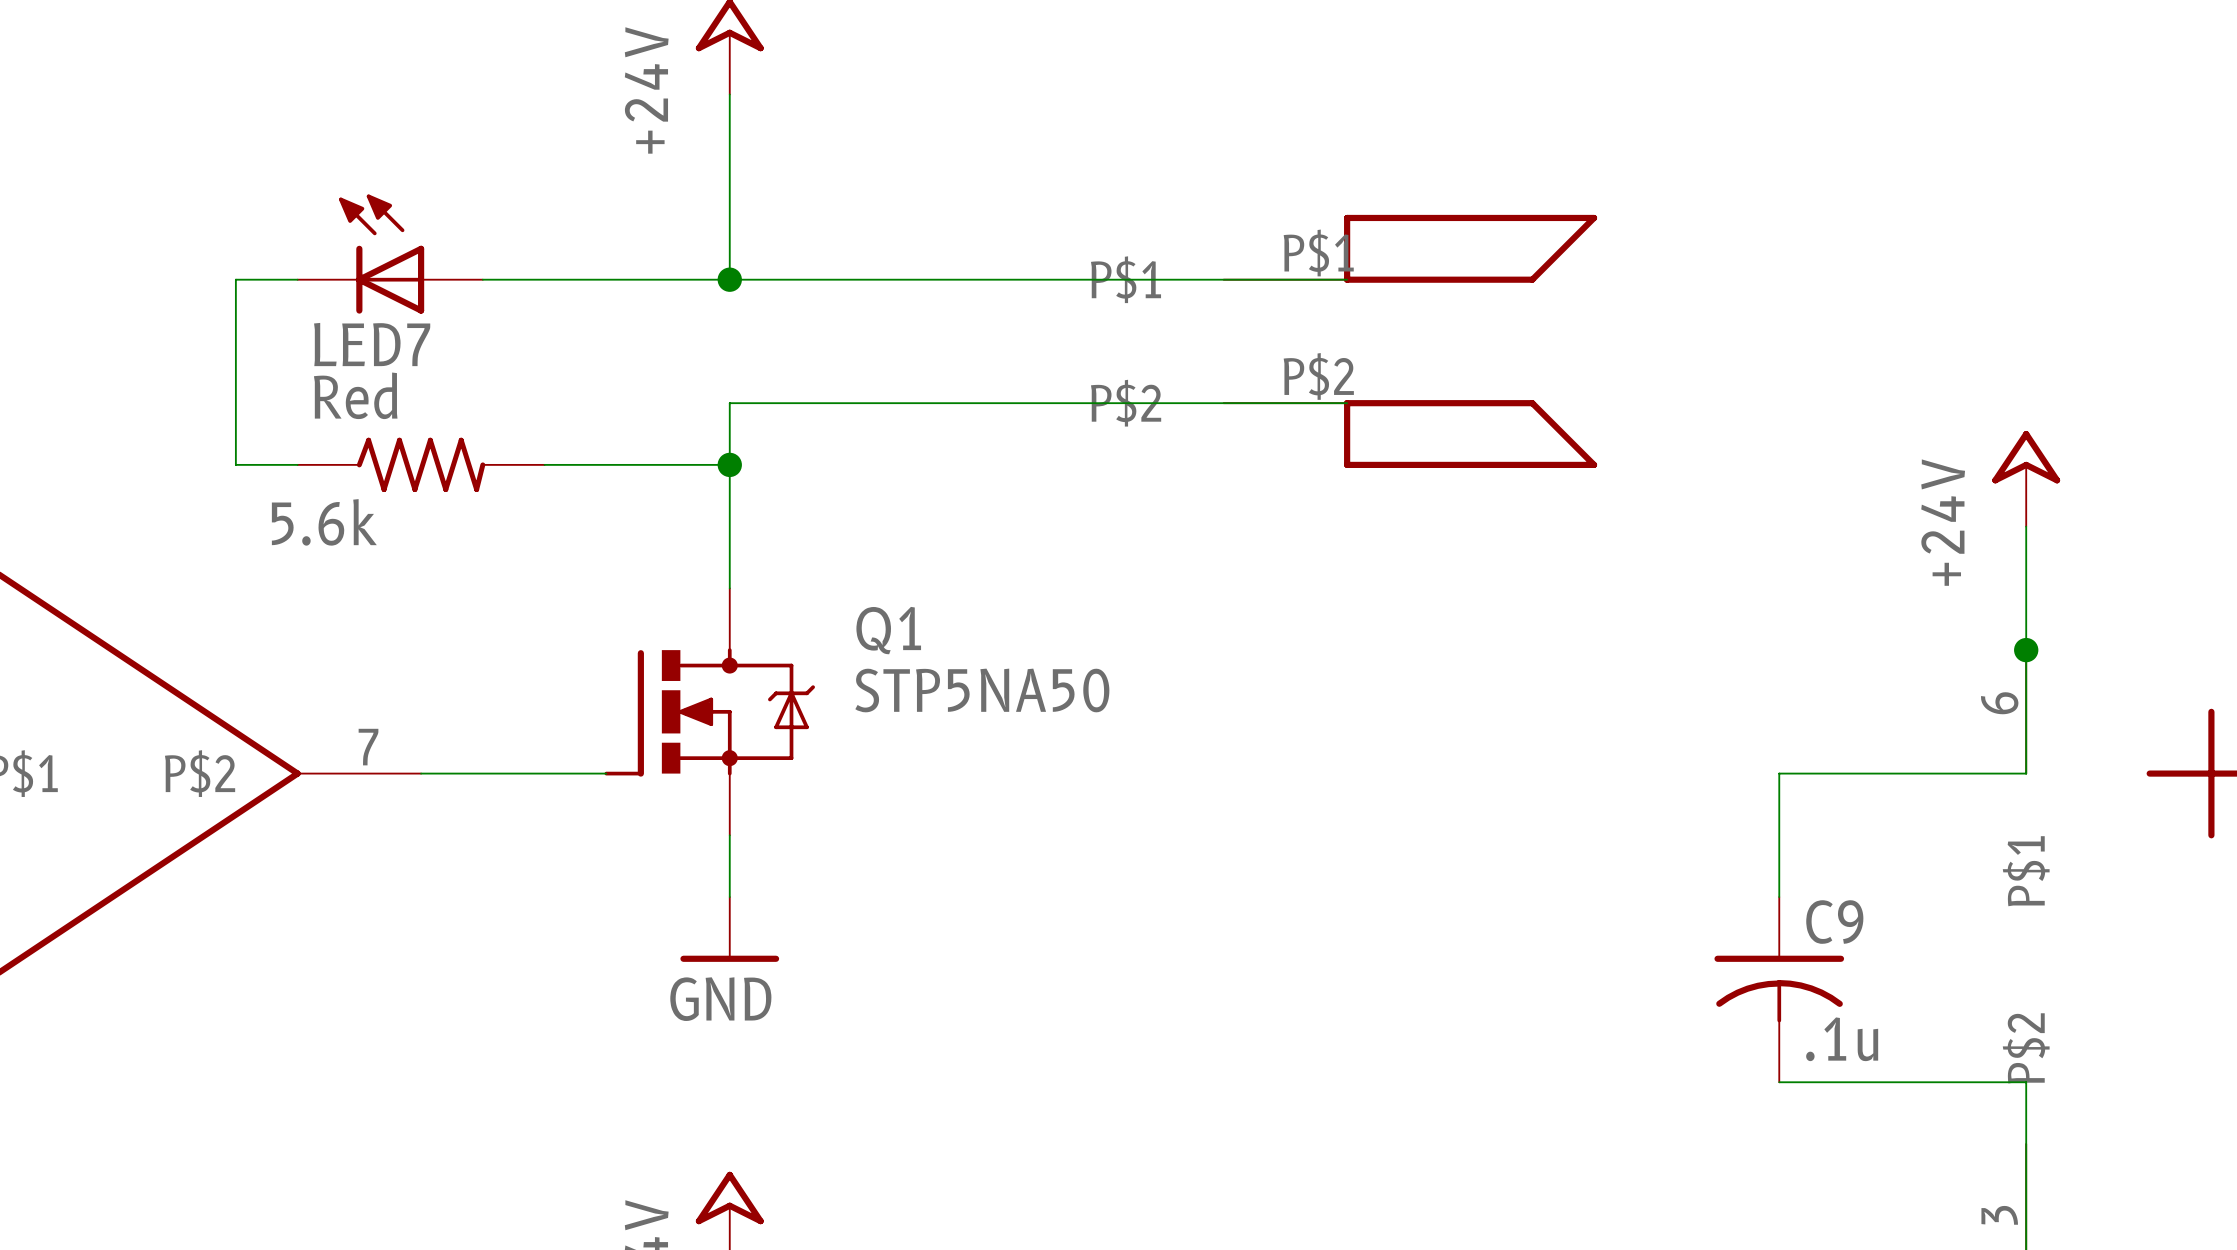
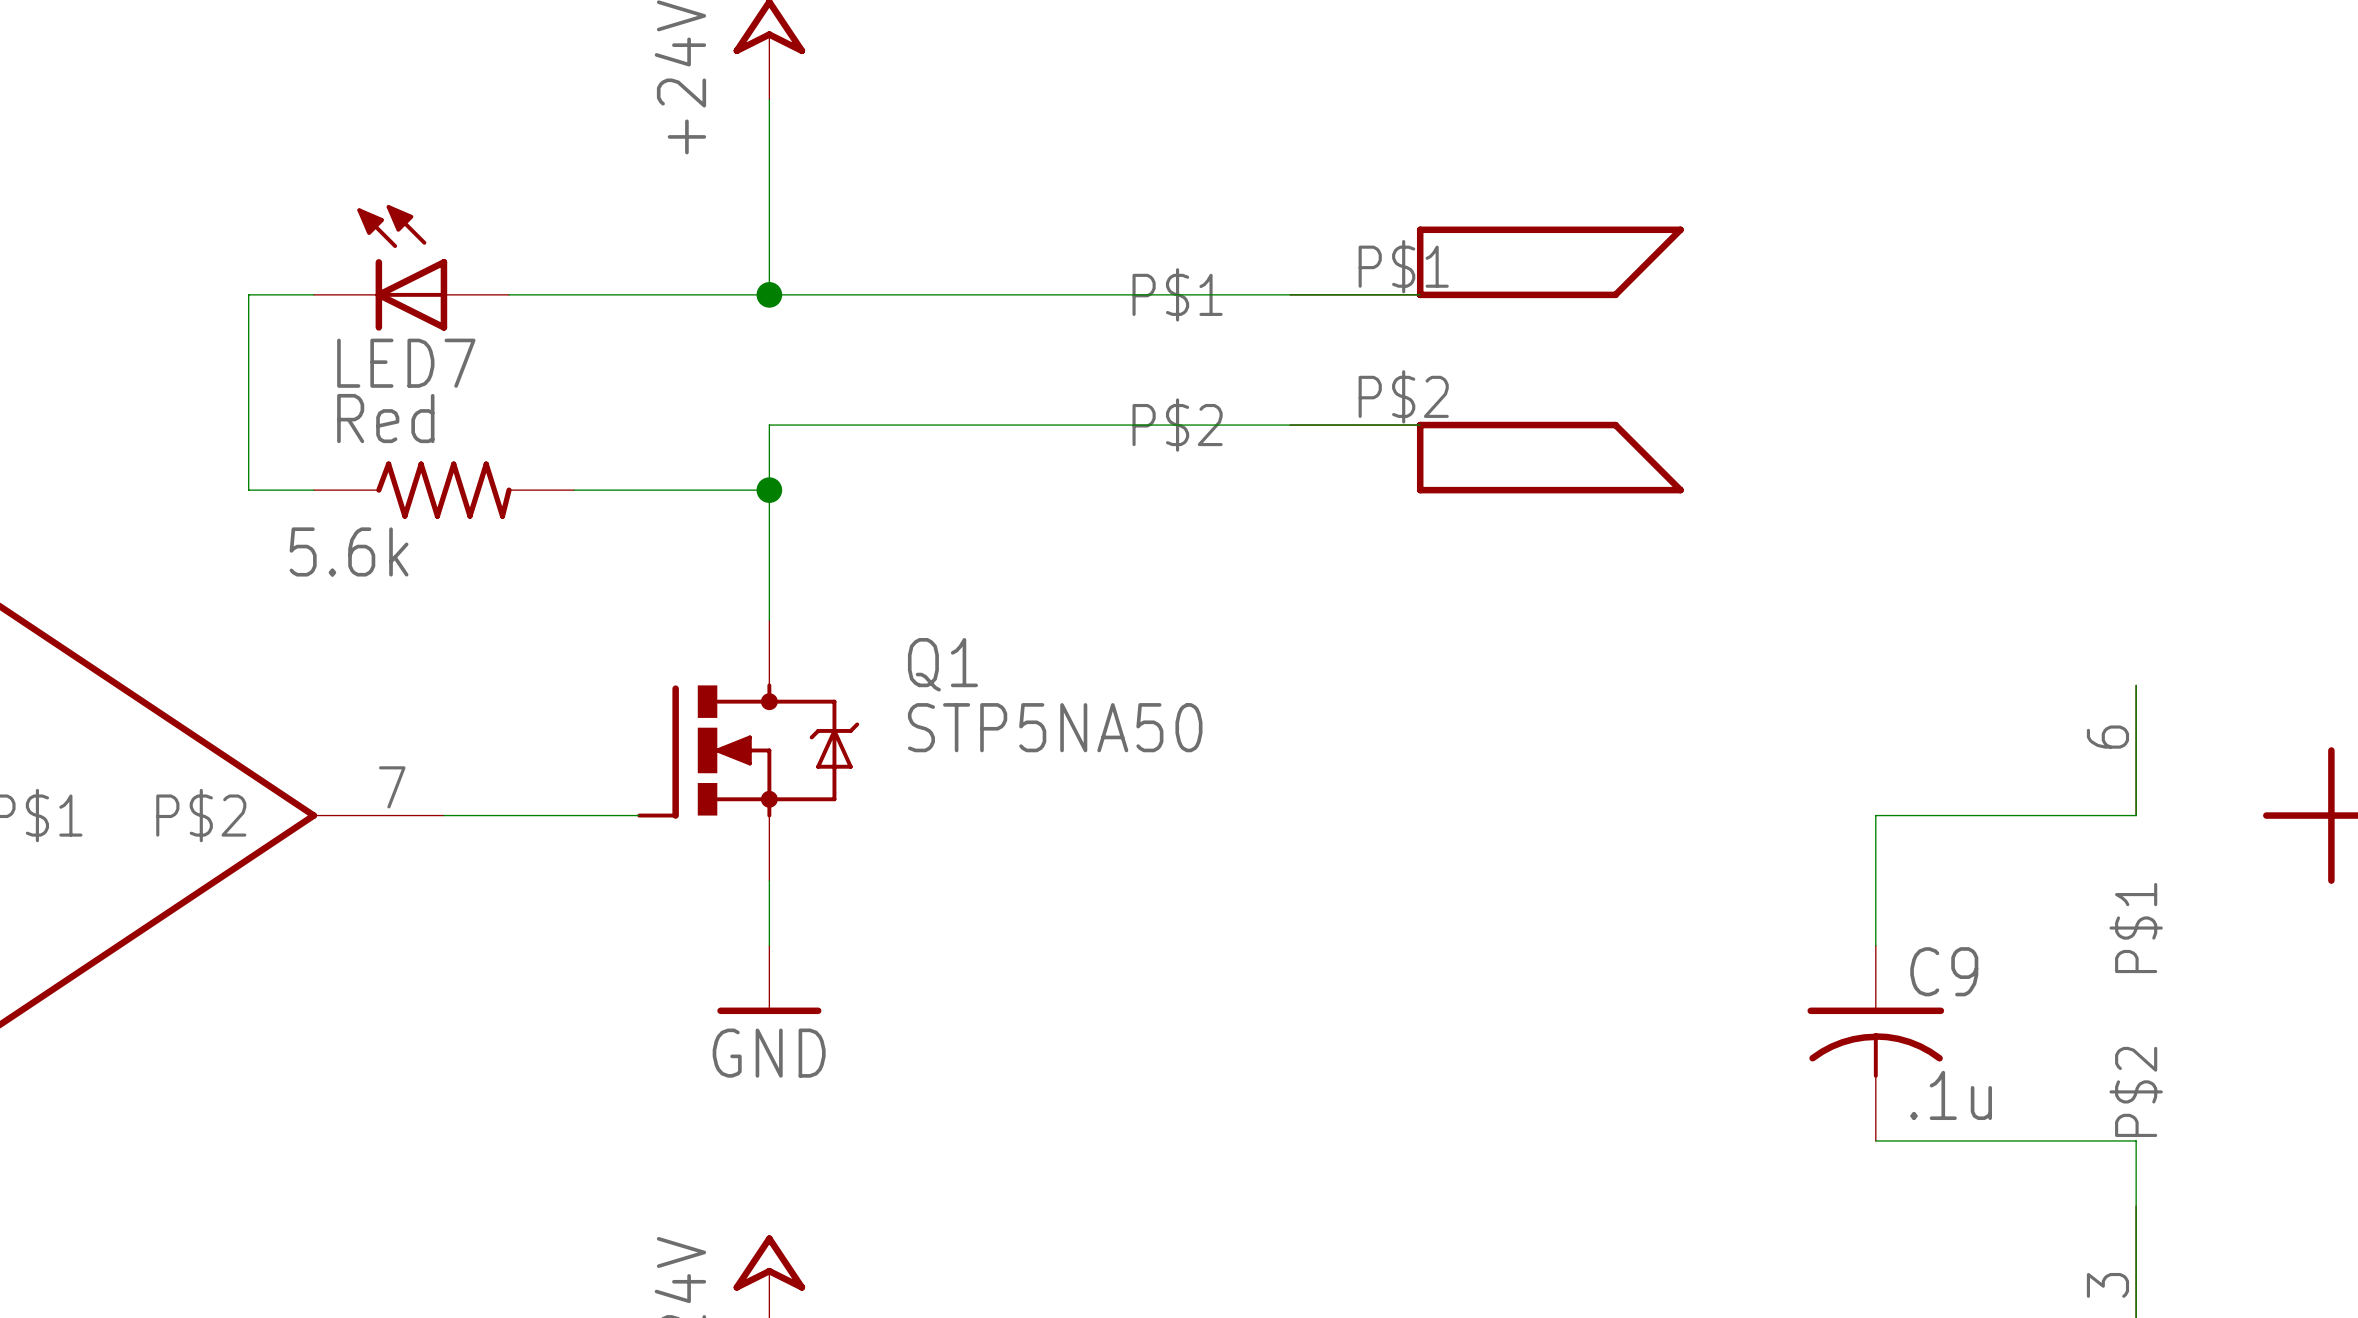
power symbol: +24V (2026, 478) -> none
wire: (2026, 526) (2026, 650) -> none
junction: (2026, 650) -> none

